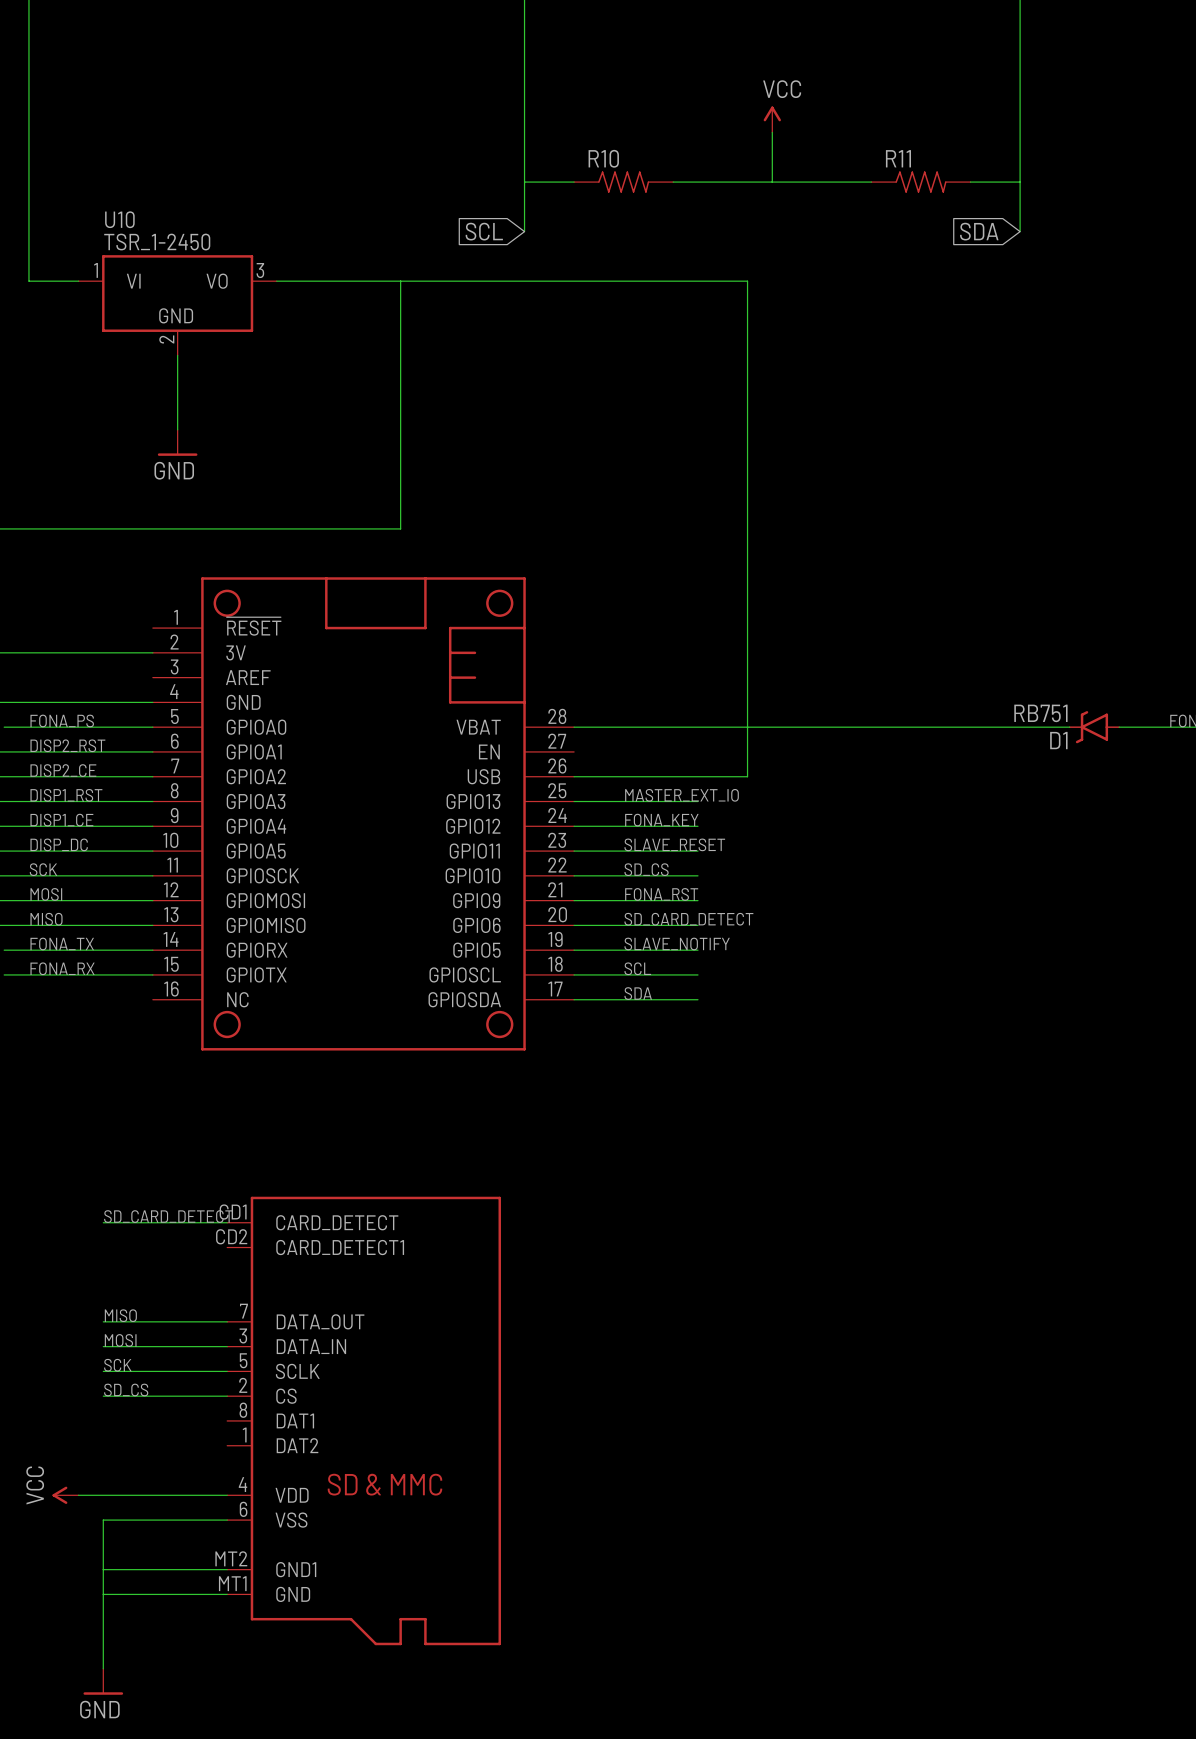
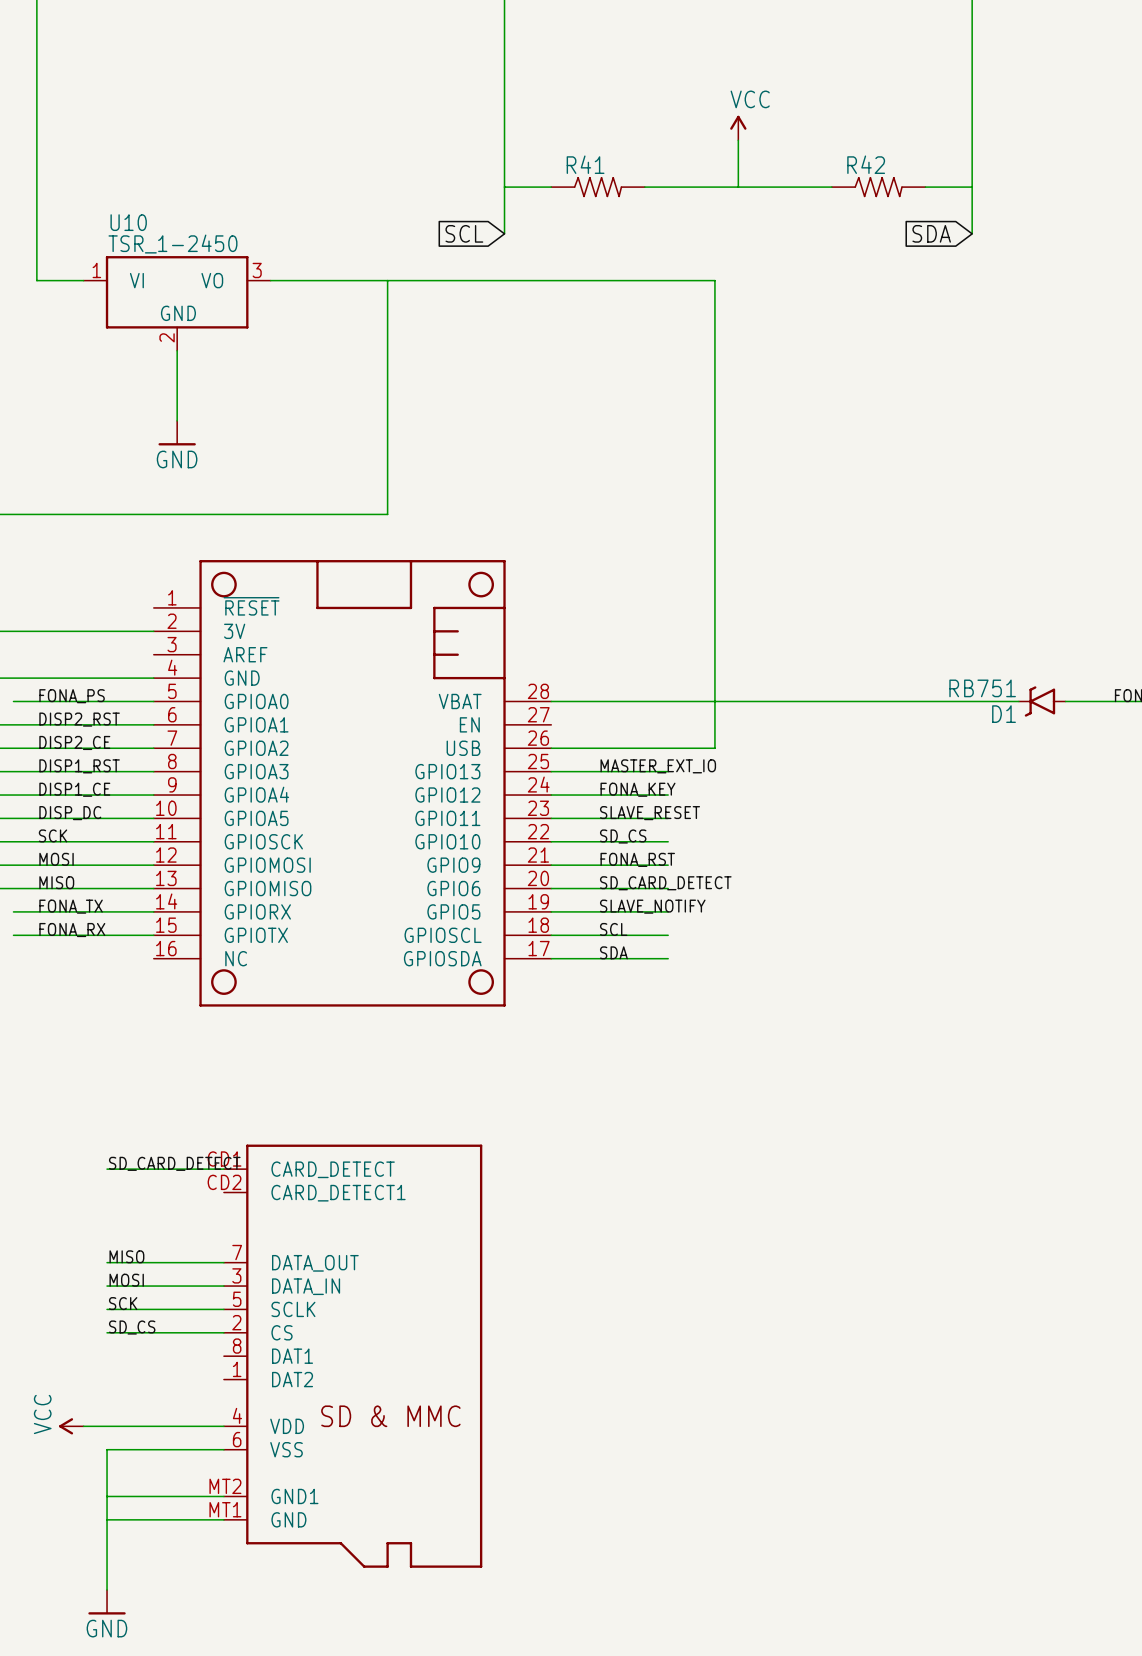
R10 name: R10 (603, 158) -> R41 (585, 164)
R11 name: R11 (898, 158) -> R42 (866, 164)

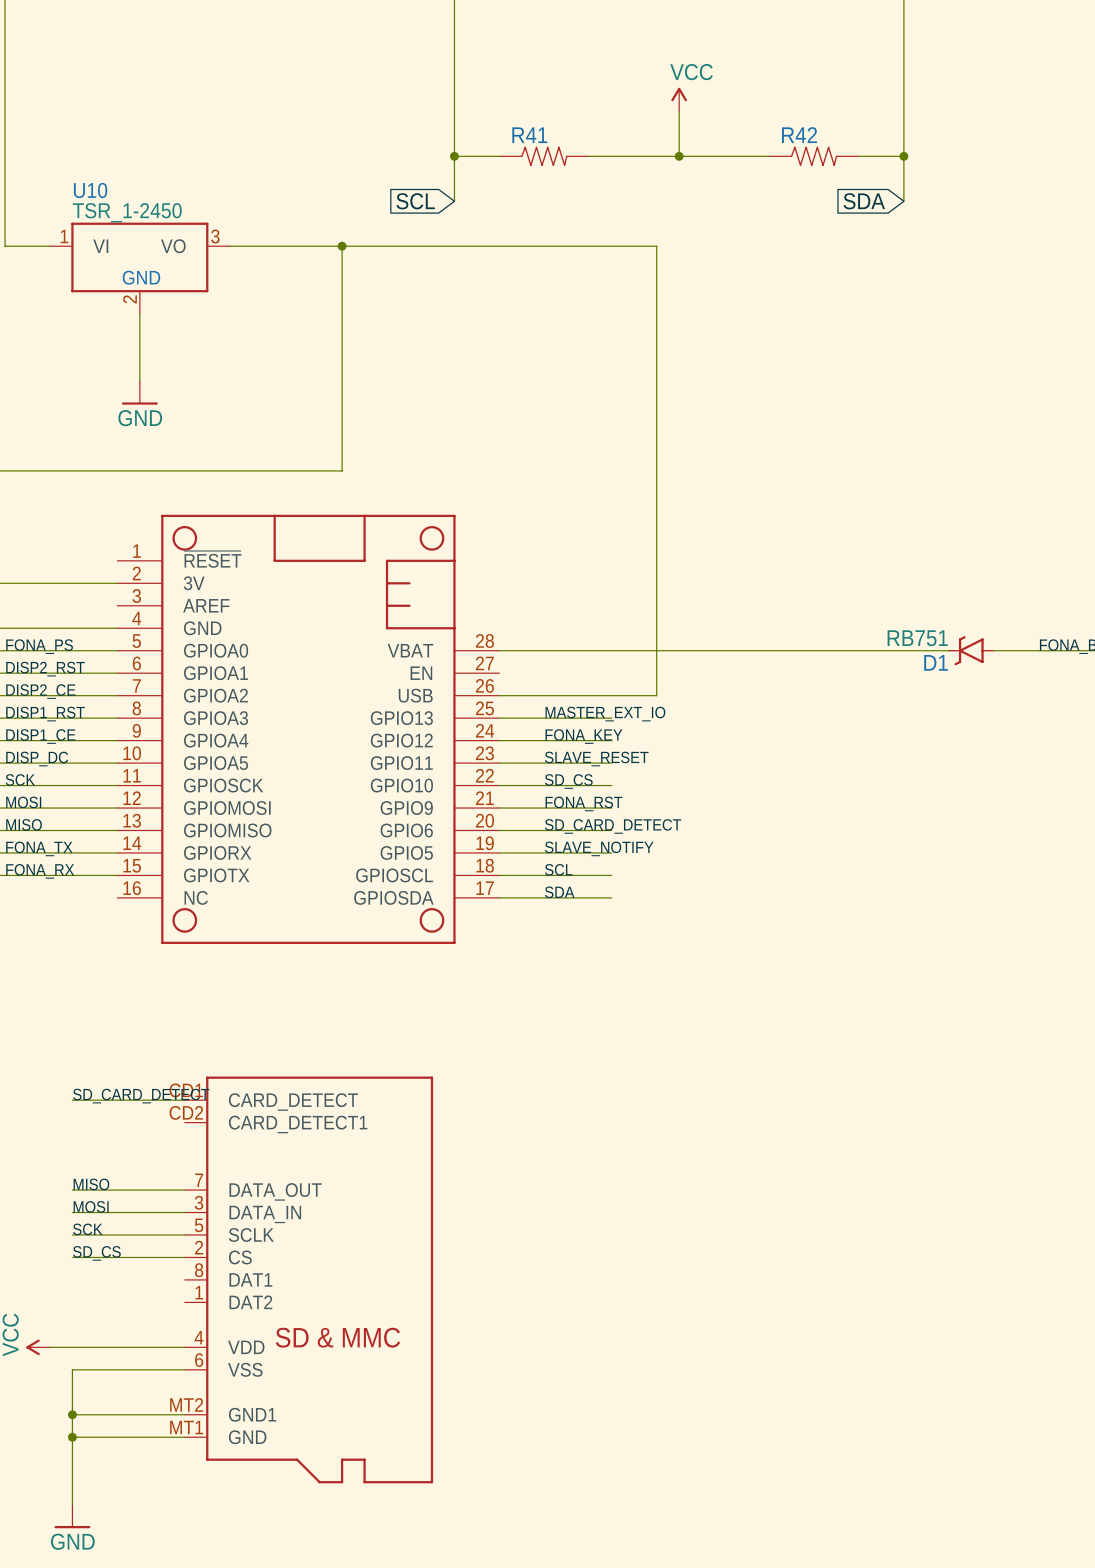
junction: none -> (454, 156)
junction: none -> (679, 156)
junction: none -> (903, 156)
junction: none -> (342, 246)
junction: none -> (72, 1414)
junction: none -> (72, 1437)

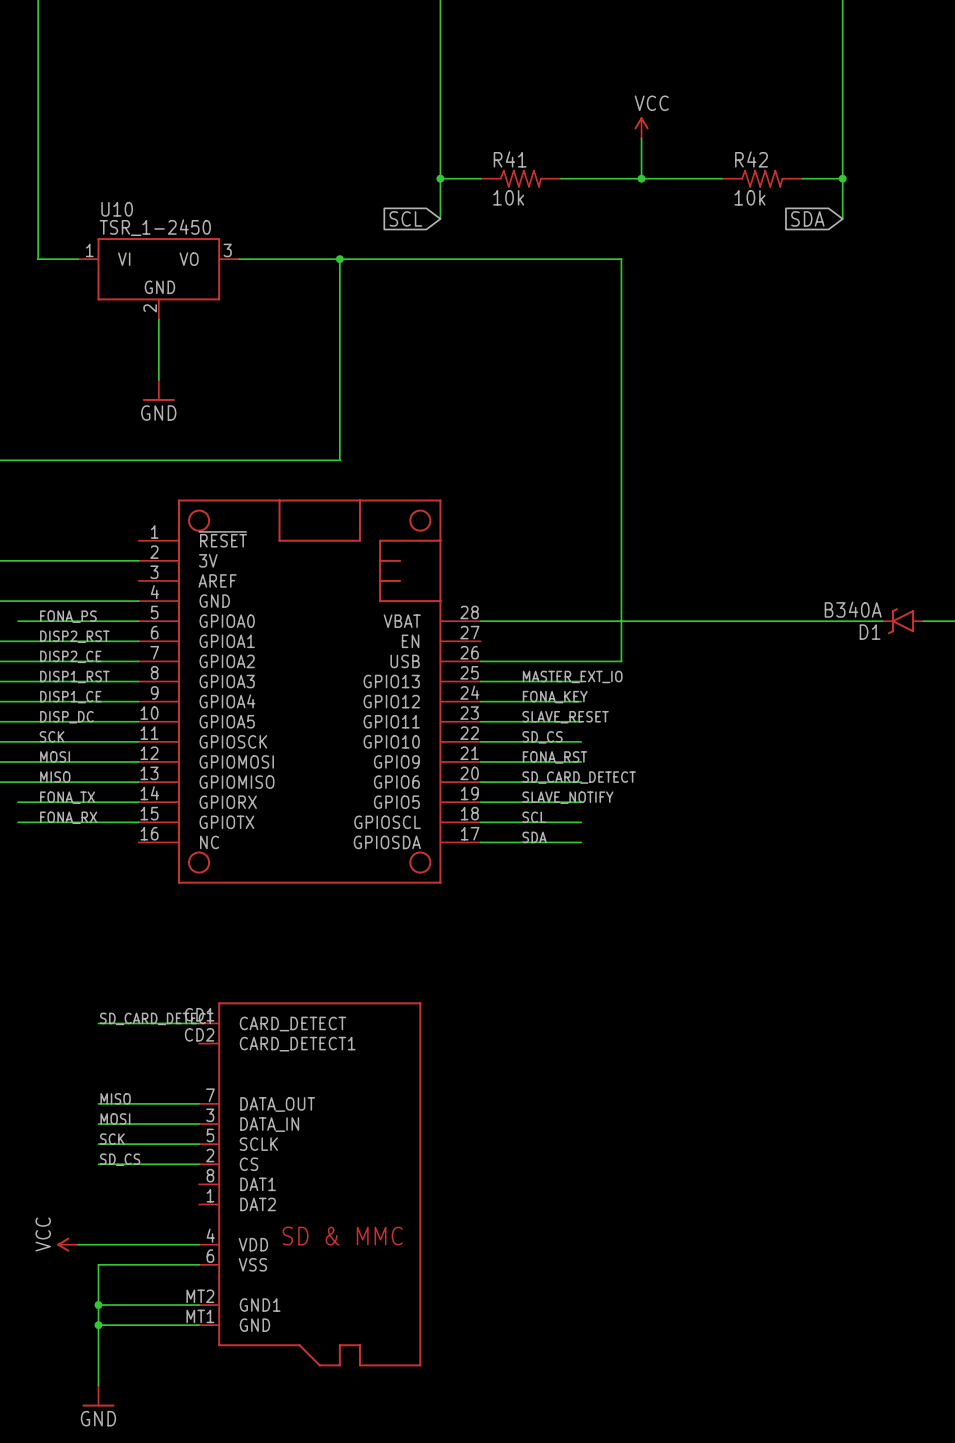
R41 value: none -> 10k (508, 197)
R42 value: none -> 10k (750, 197)
D1 value: RB751 (917, 638) -> B340A (853, 609)

